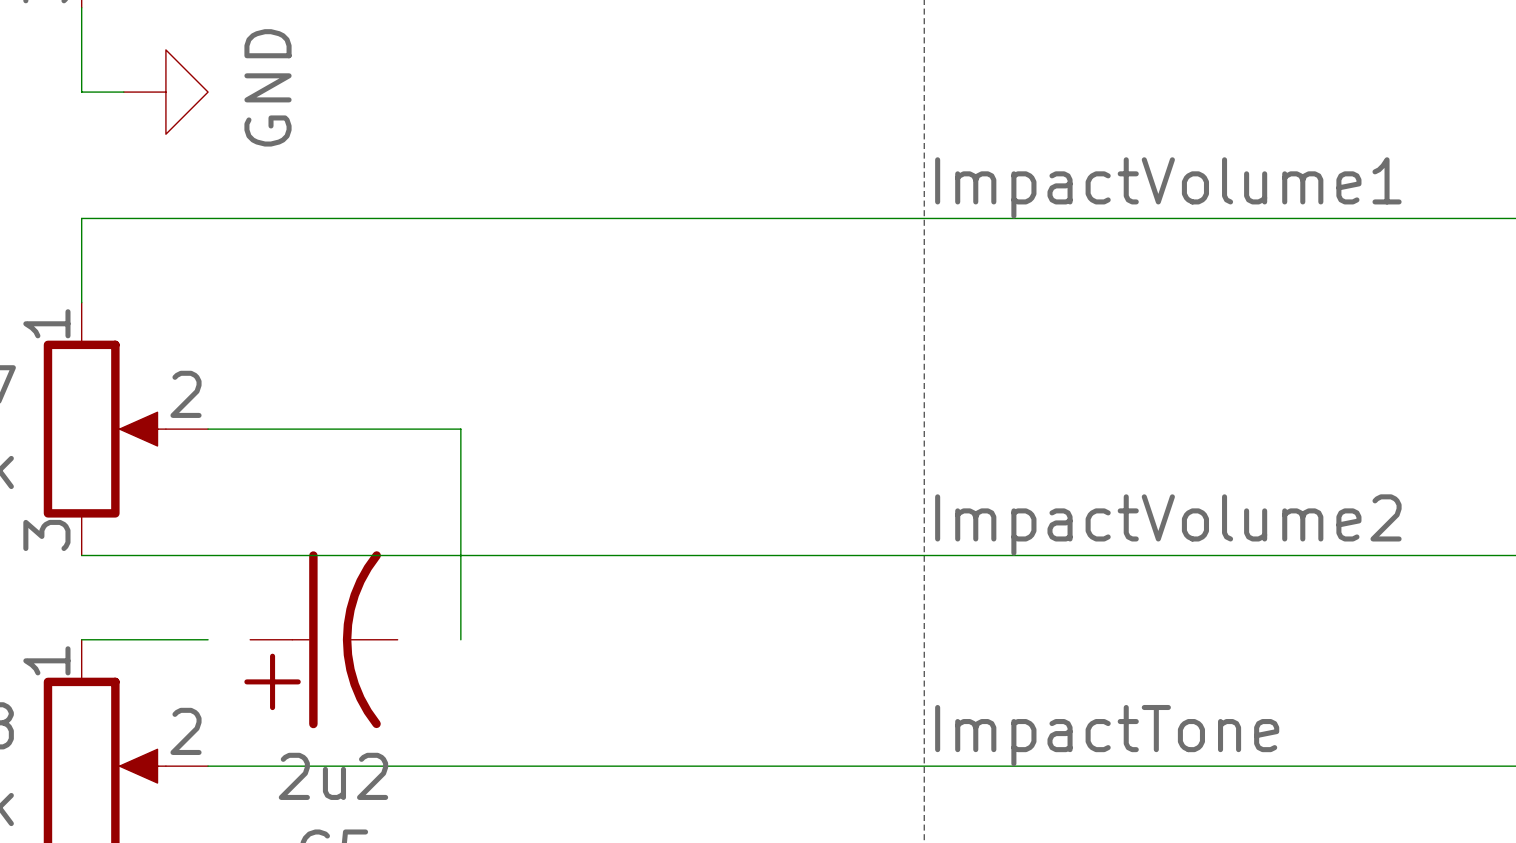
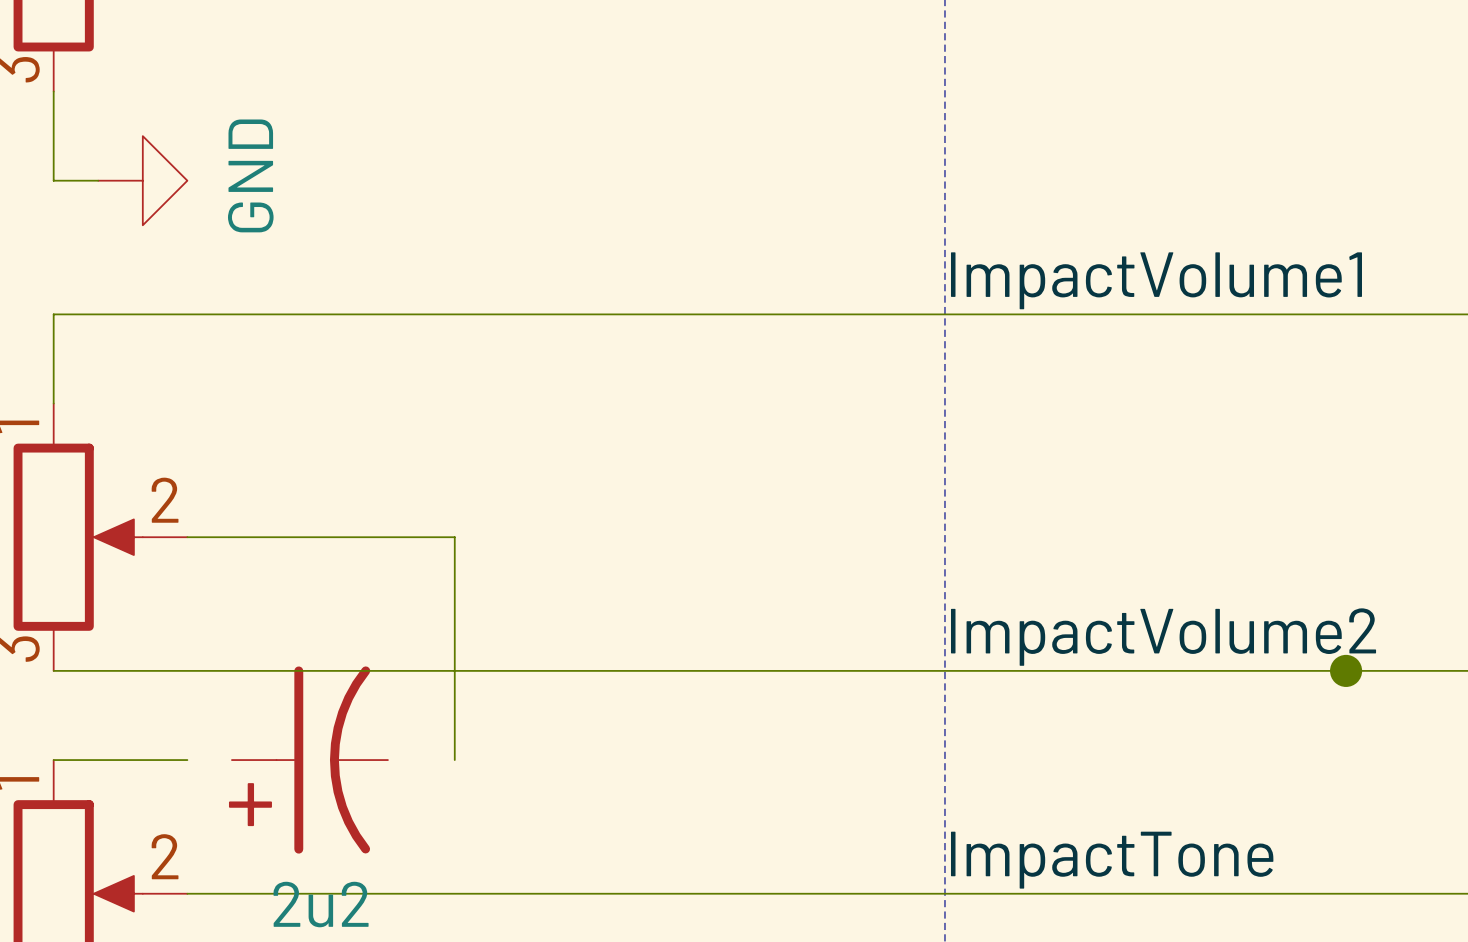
junction: none -> (1346, 670)

